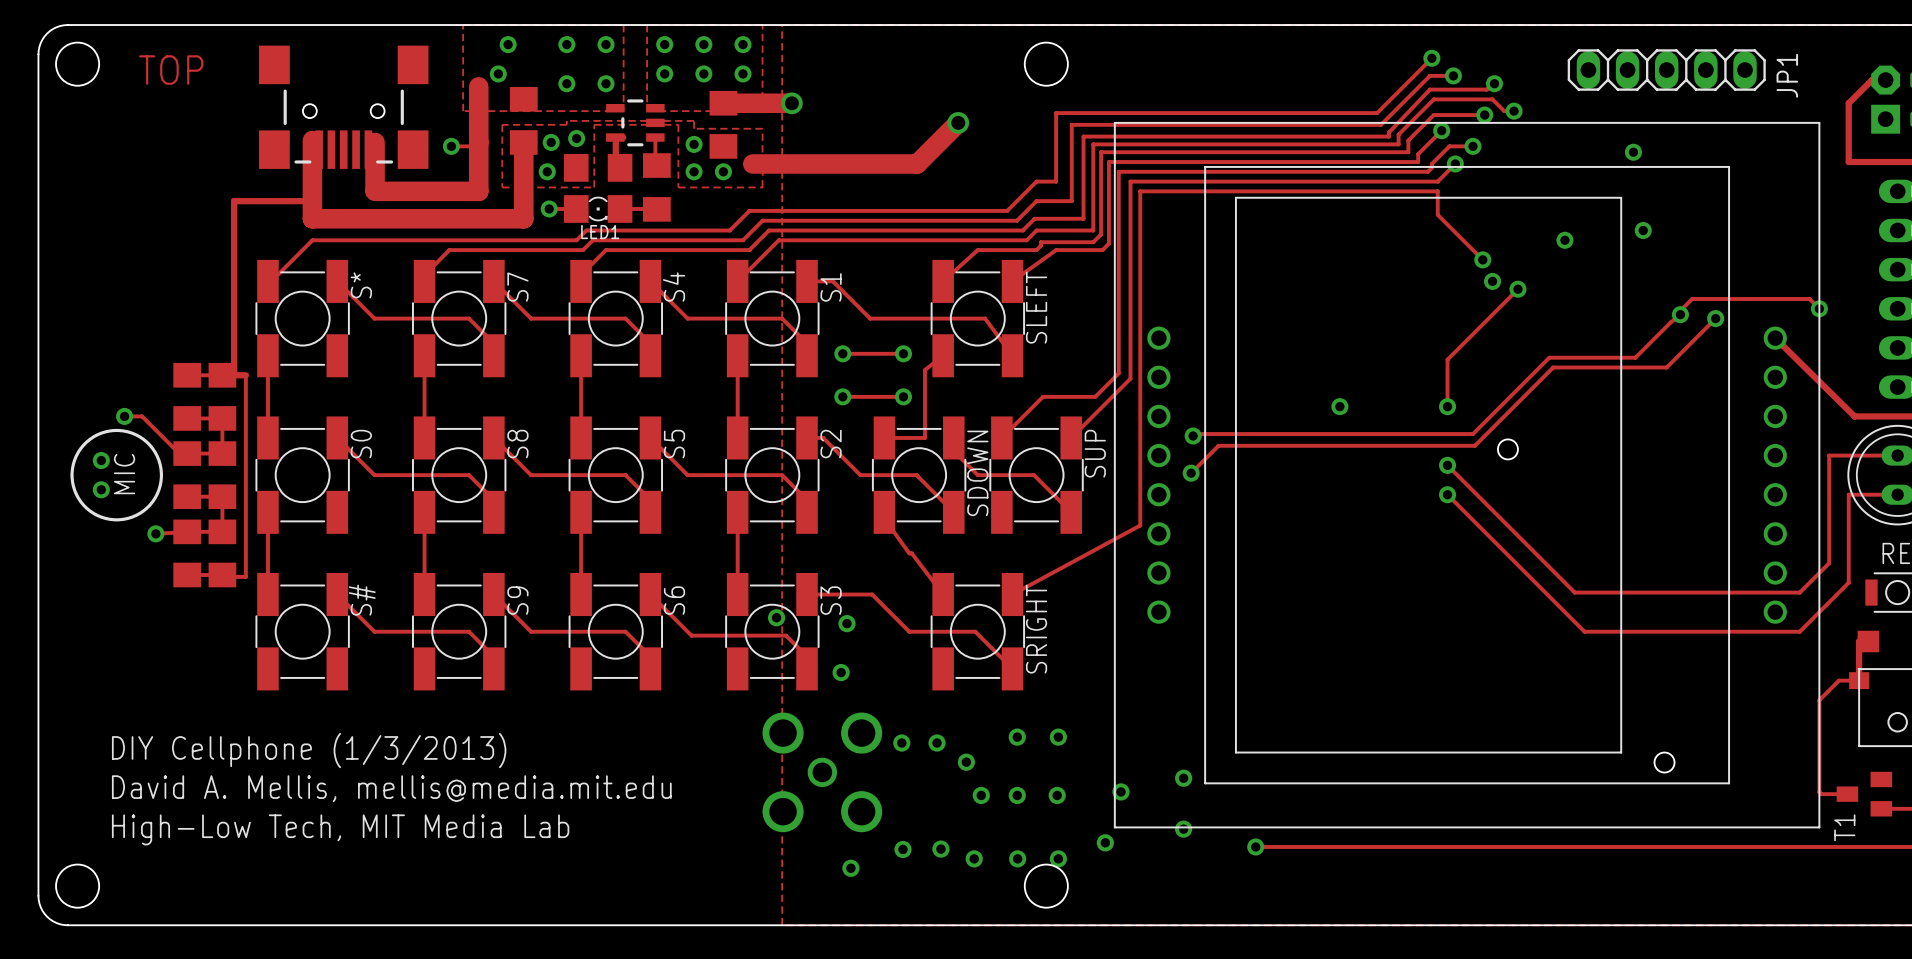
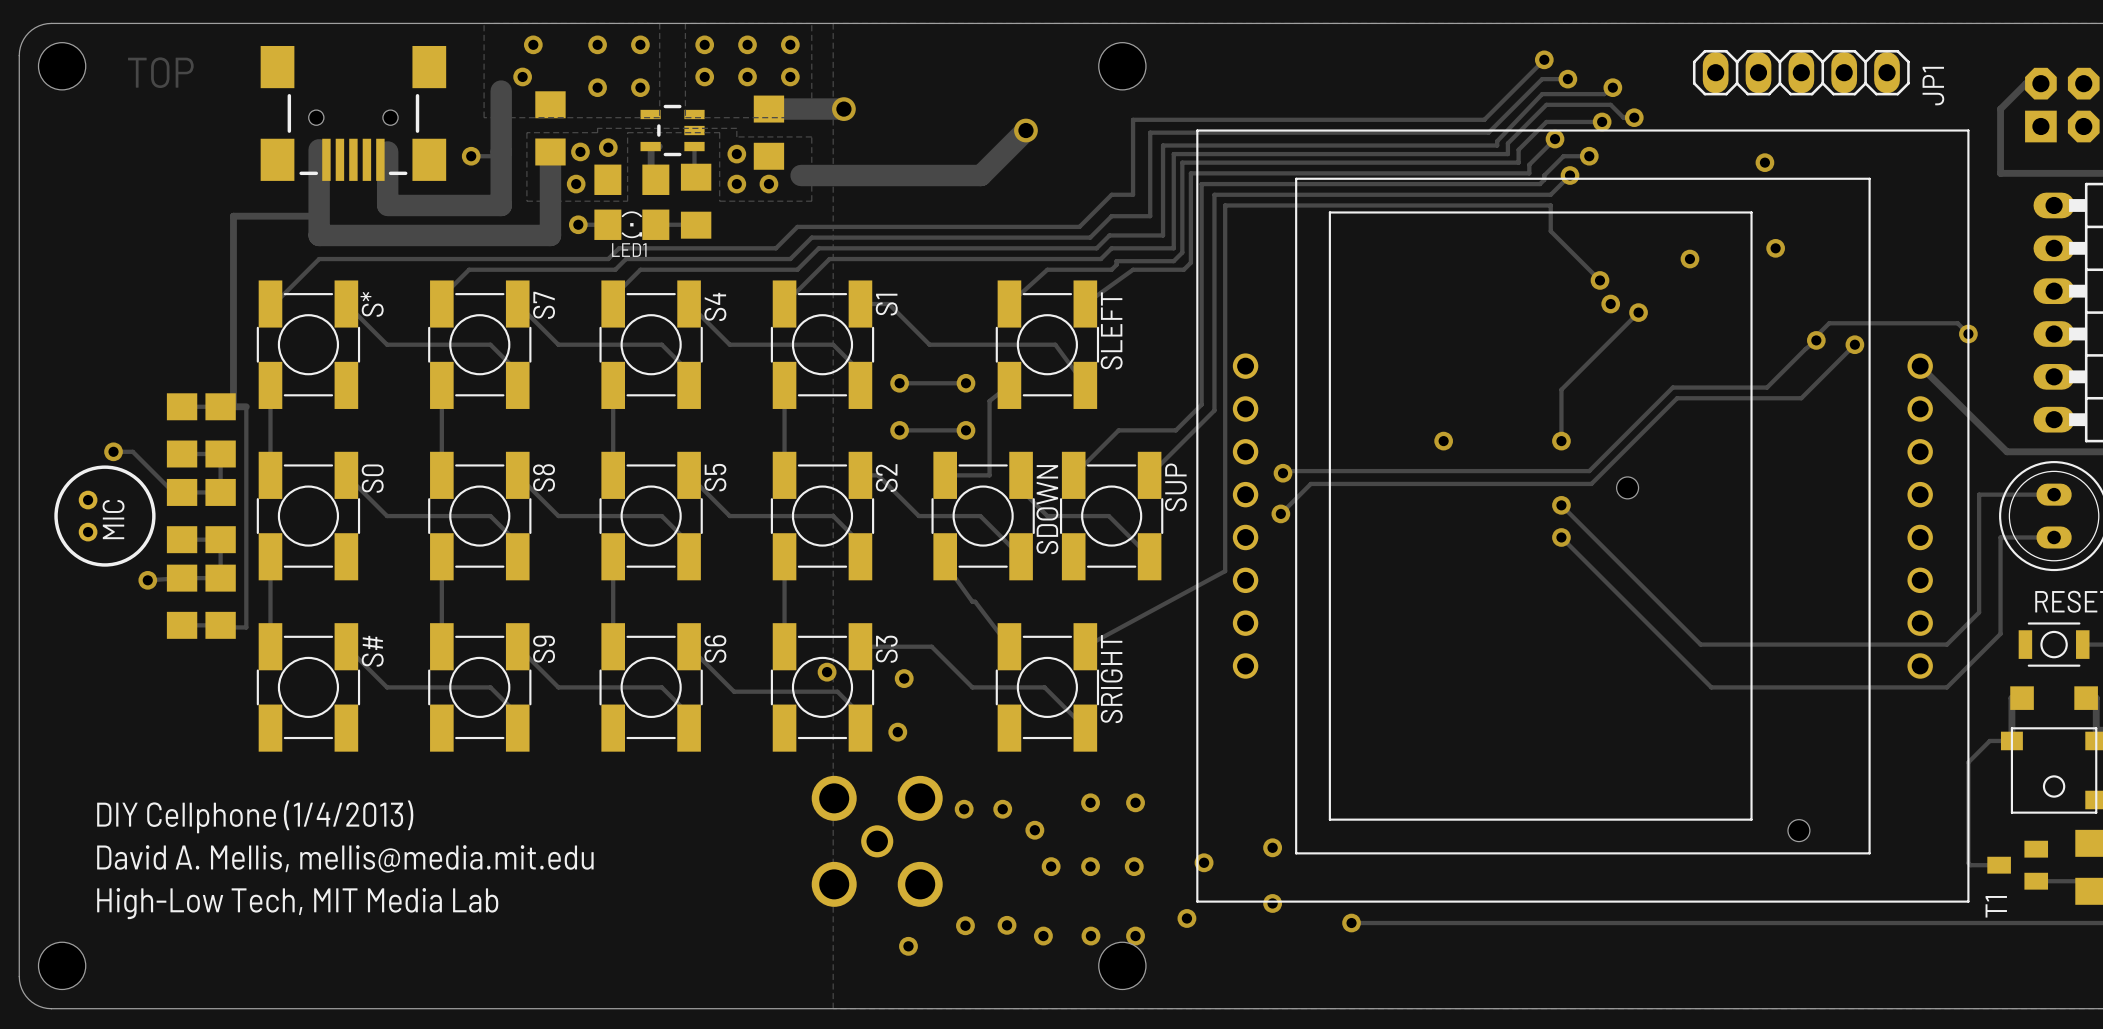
text: DIY Cellphone (1/3/2013) (309, 750) -> DIY Cellphone (1/4/2013) (255, 816)

